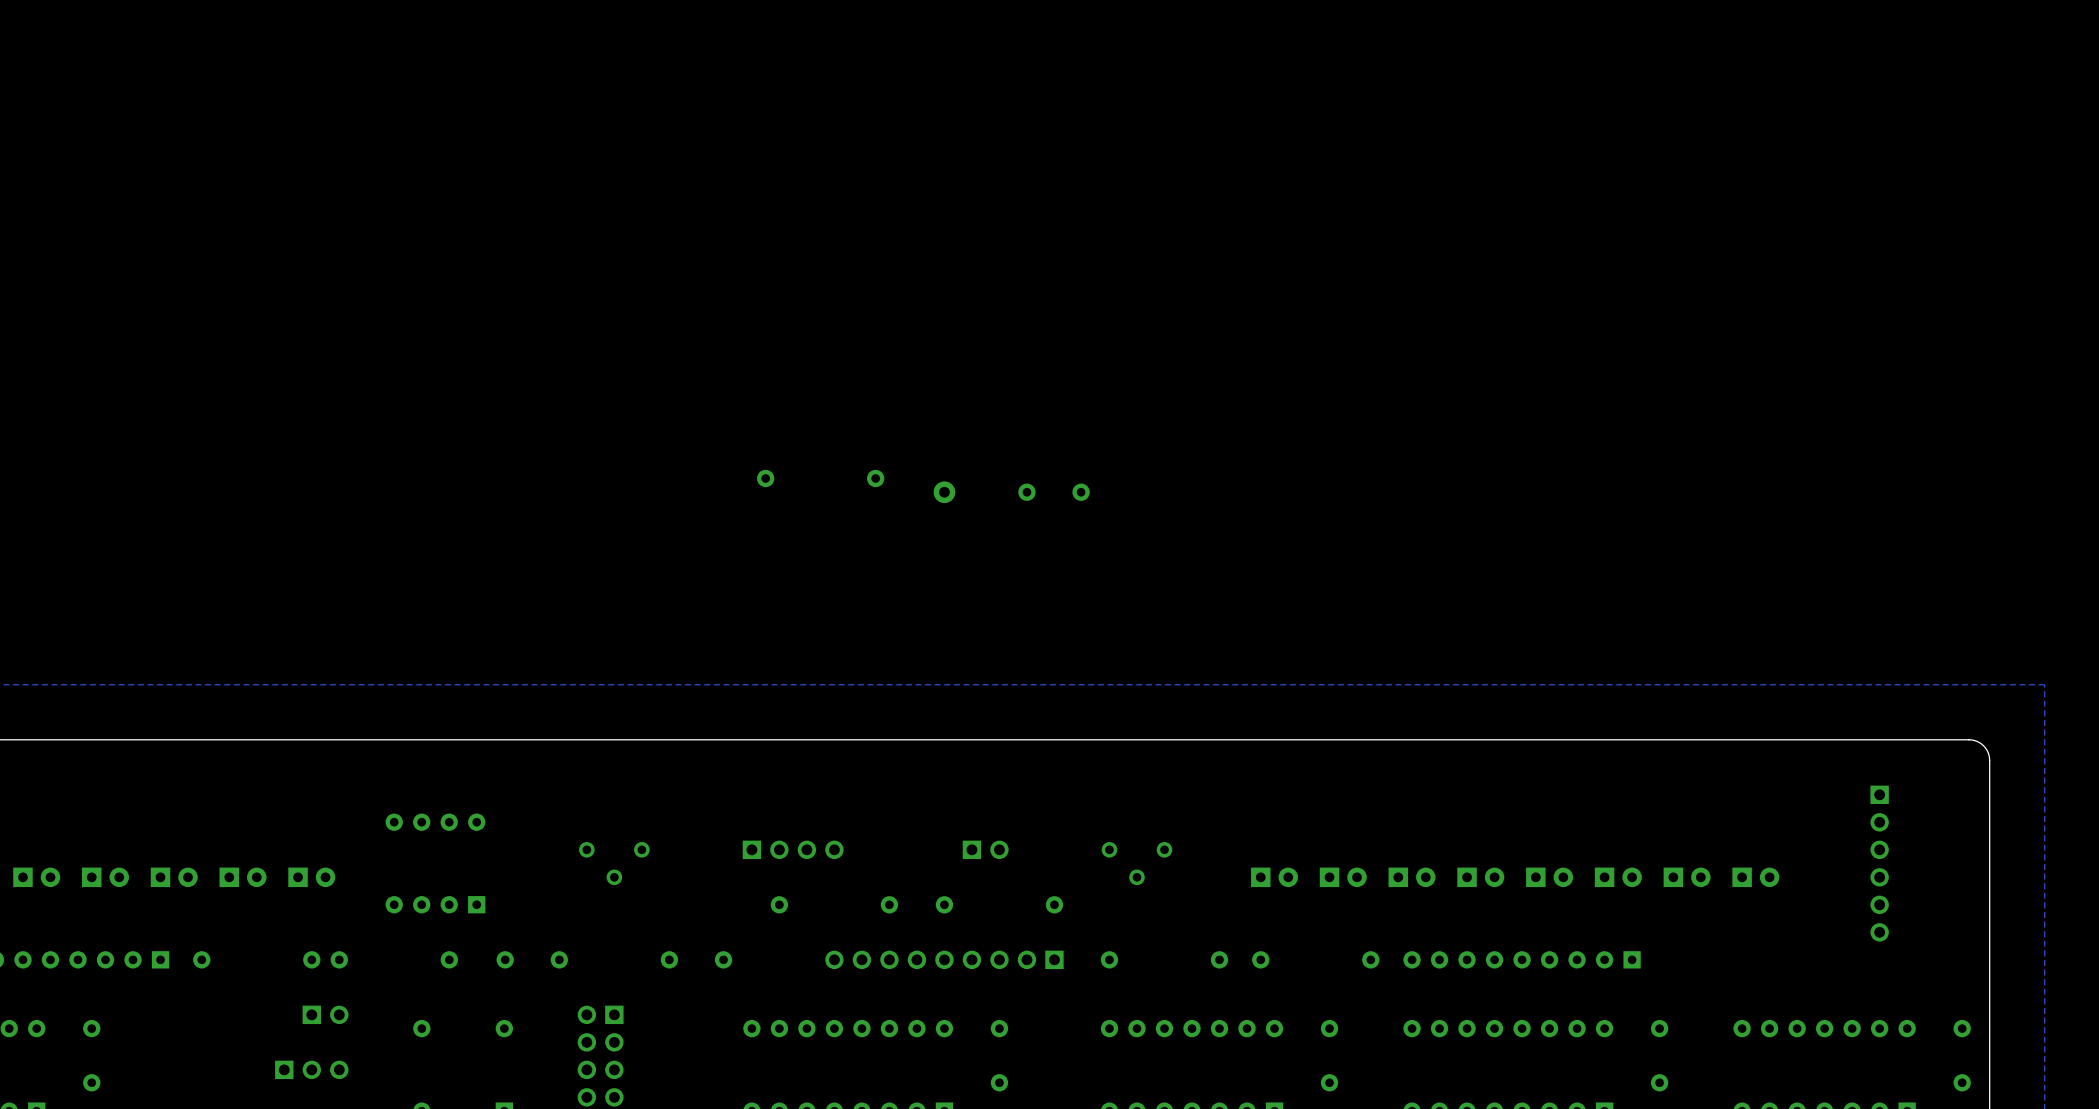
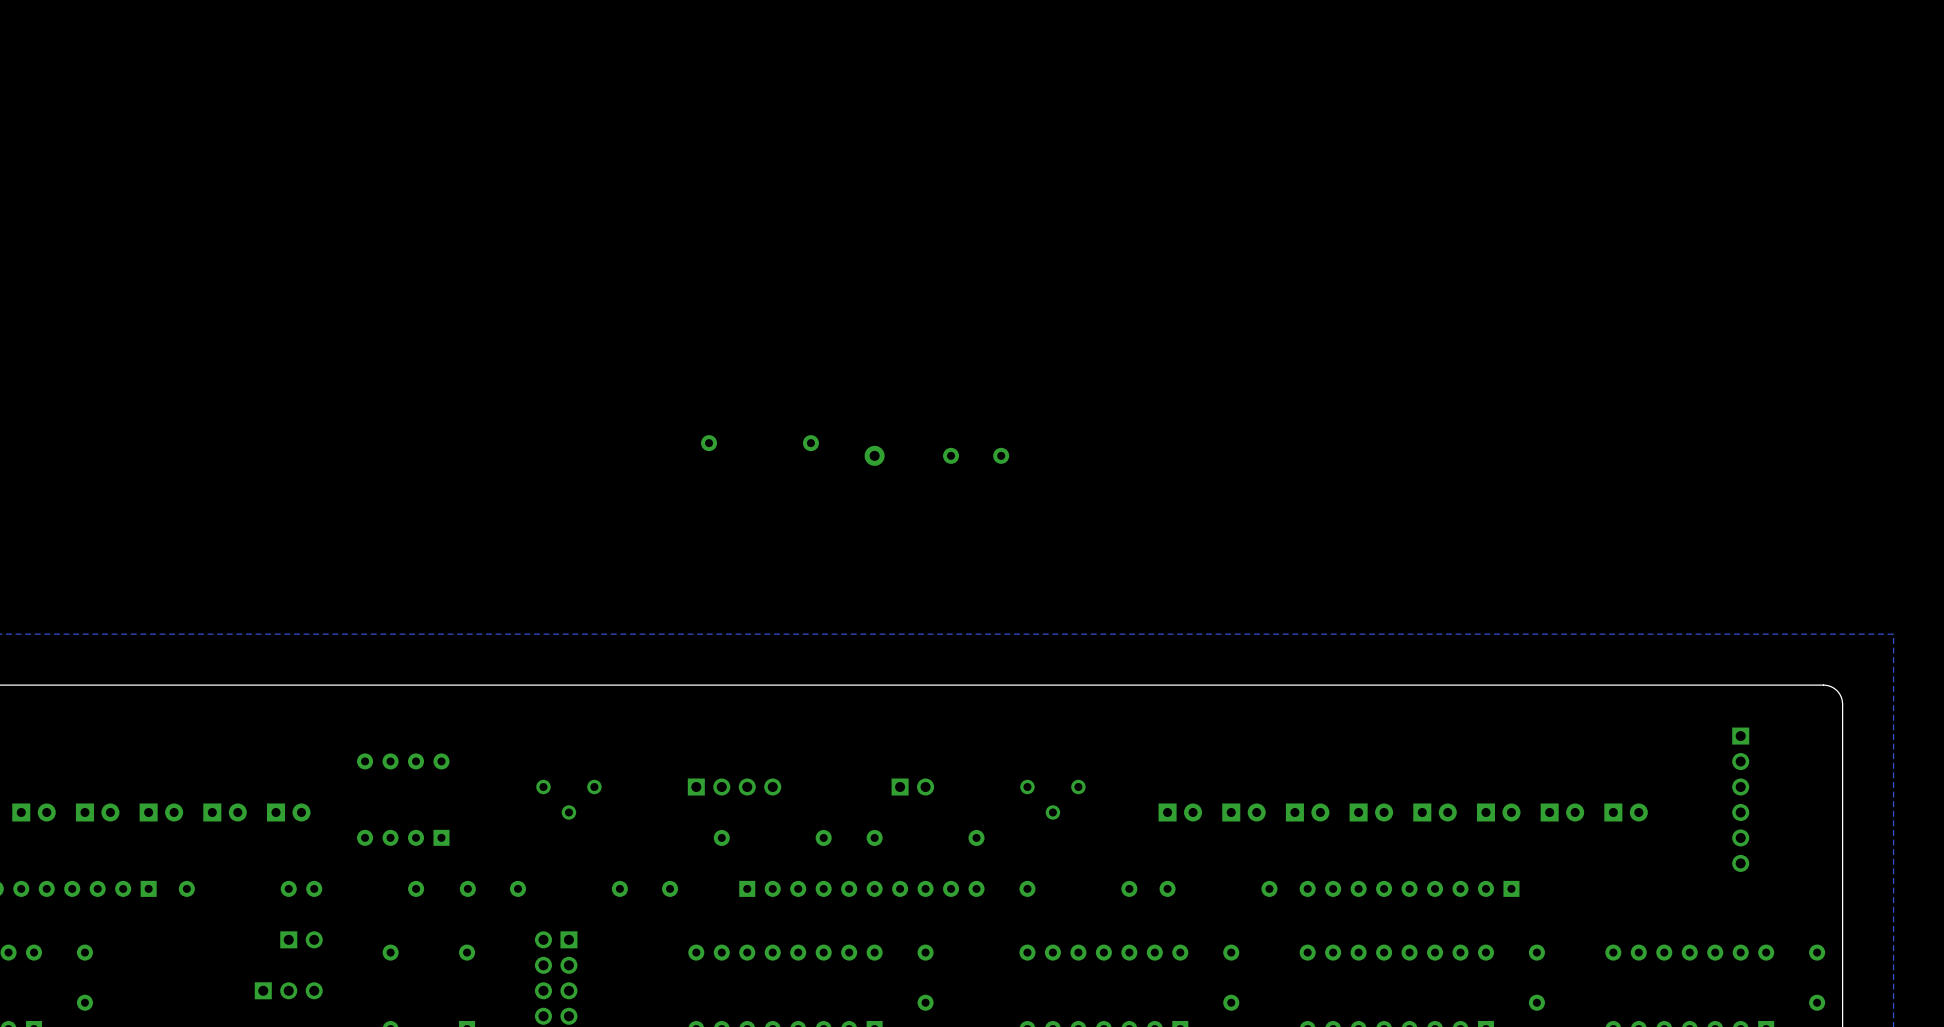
part: none -> (861, 888)
part: (944, 959) -> none

